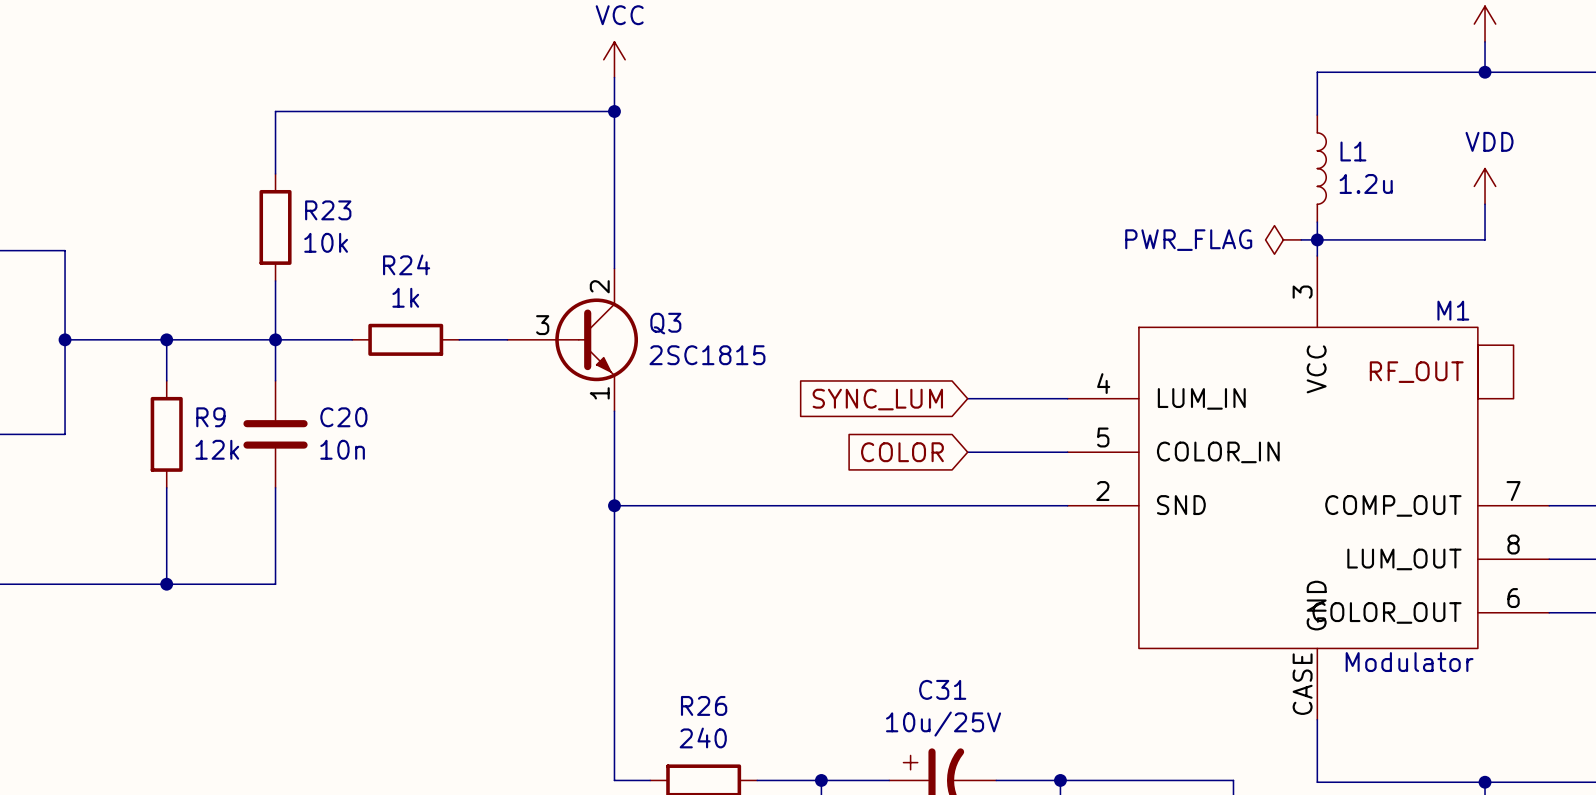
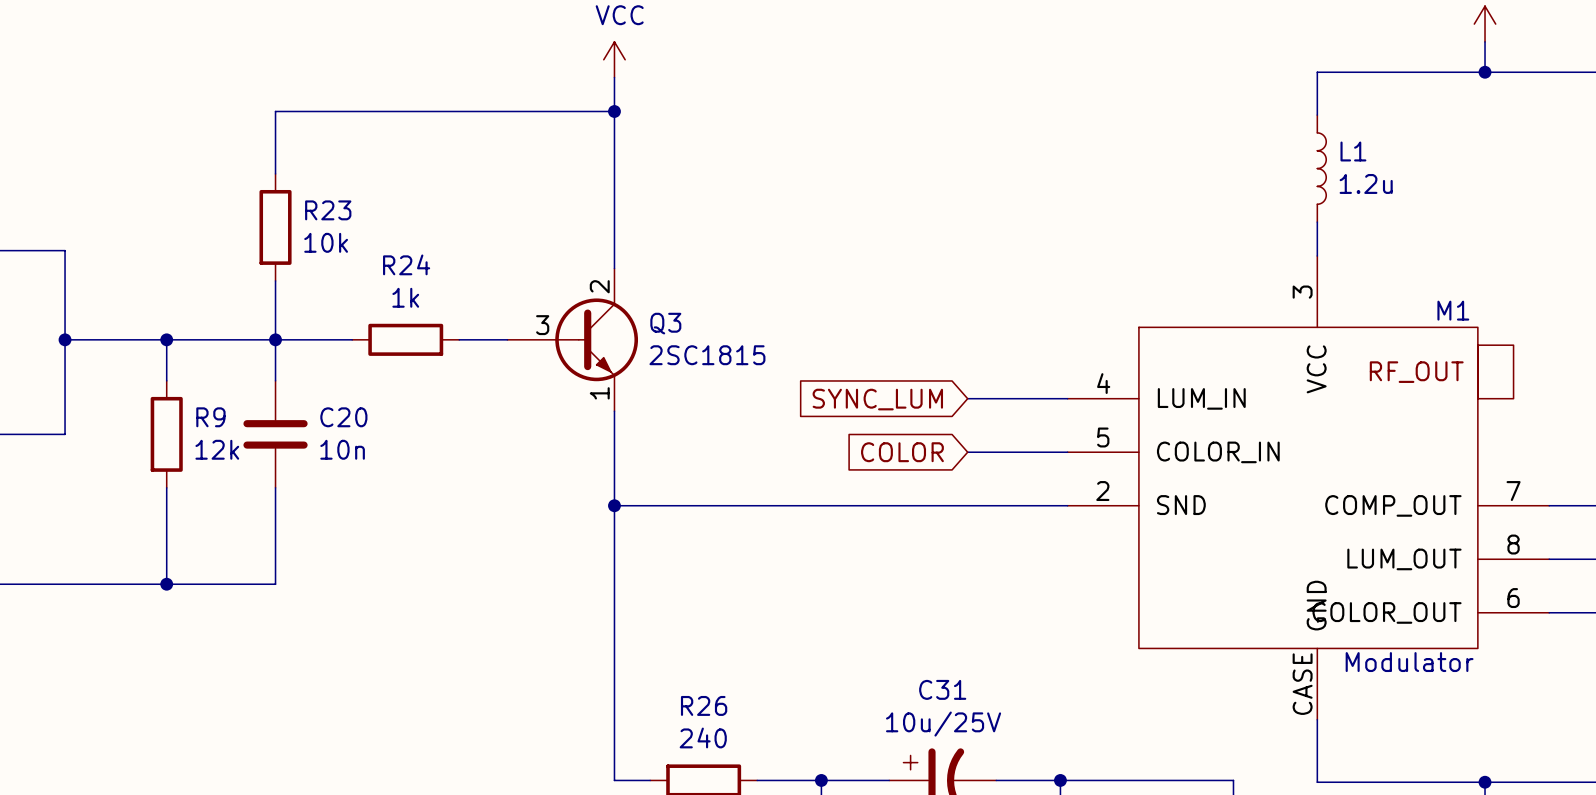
power symbol: VDD (1485, 186) -> none
wire: (1485, 204) (1485, 239) (1301, 239) -> none
power symbol: PWR_FLAG (1283, 239) -> none
junction: (1317, 239) -> none

